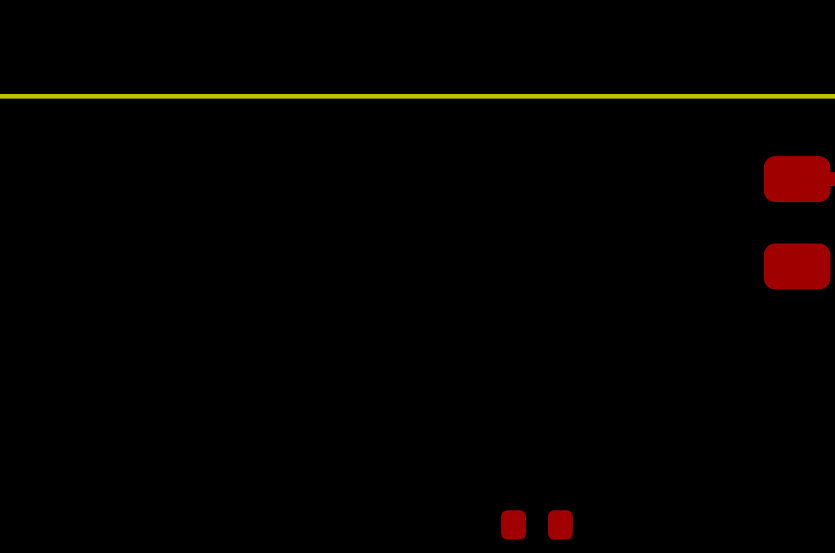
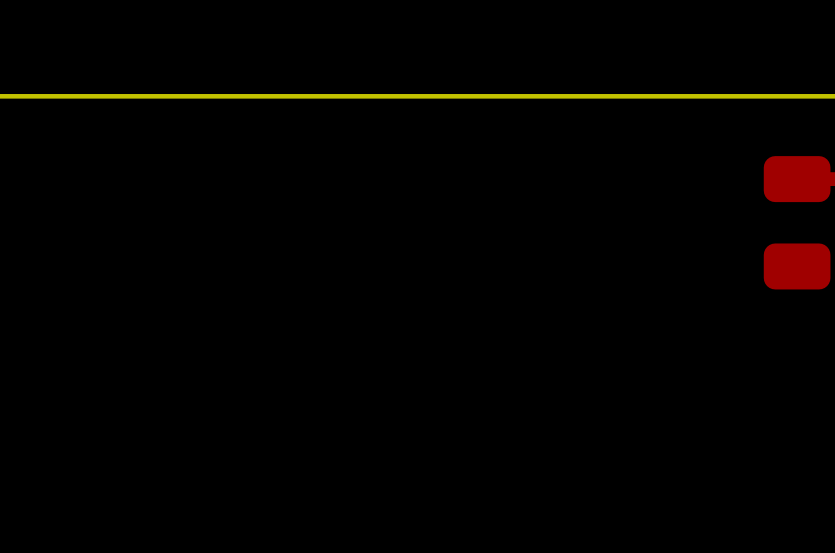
part: (536, 524) -> none

